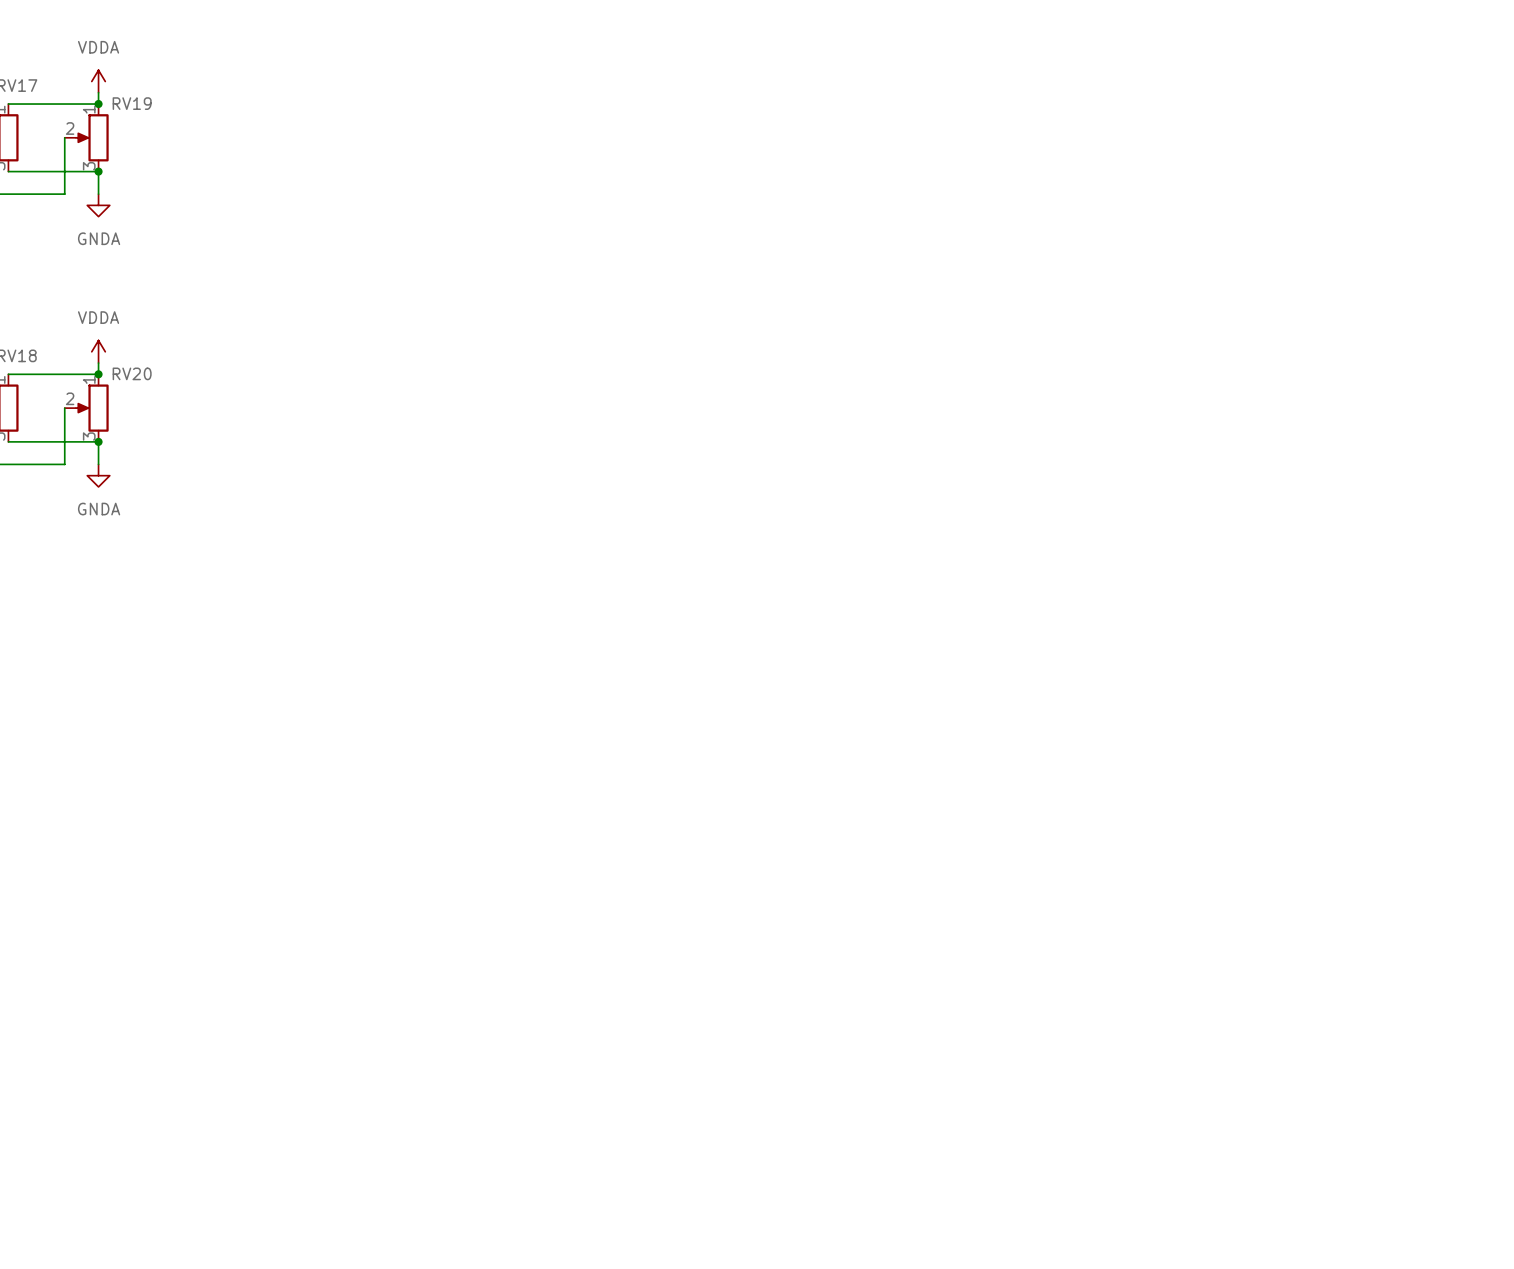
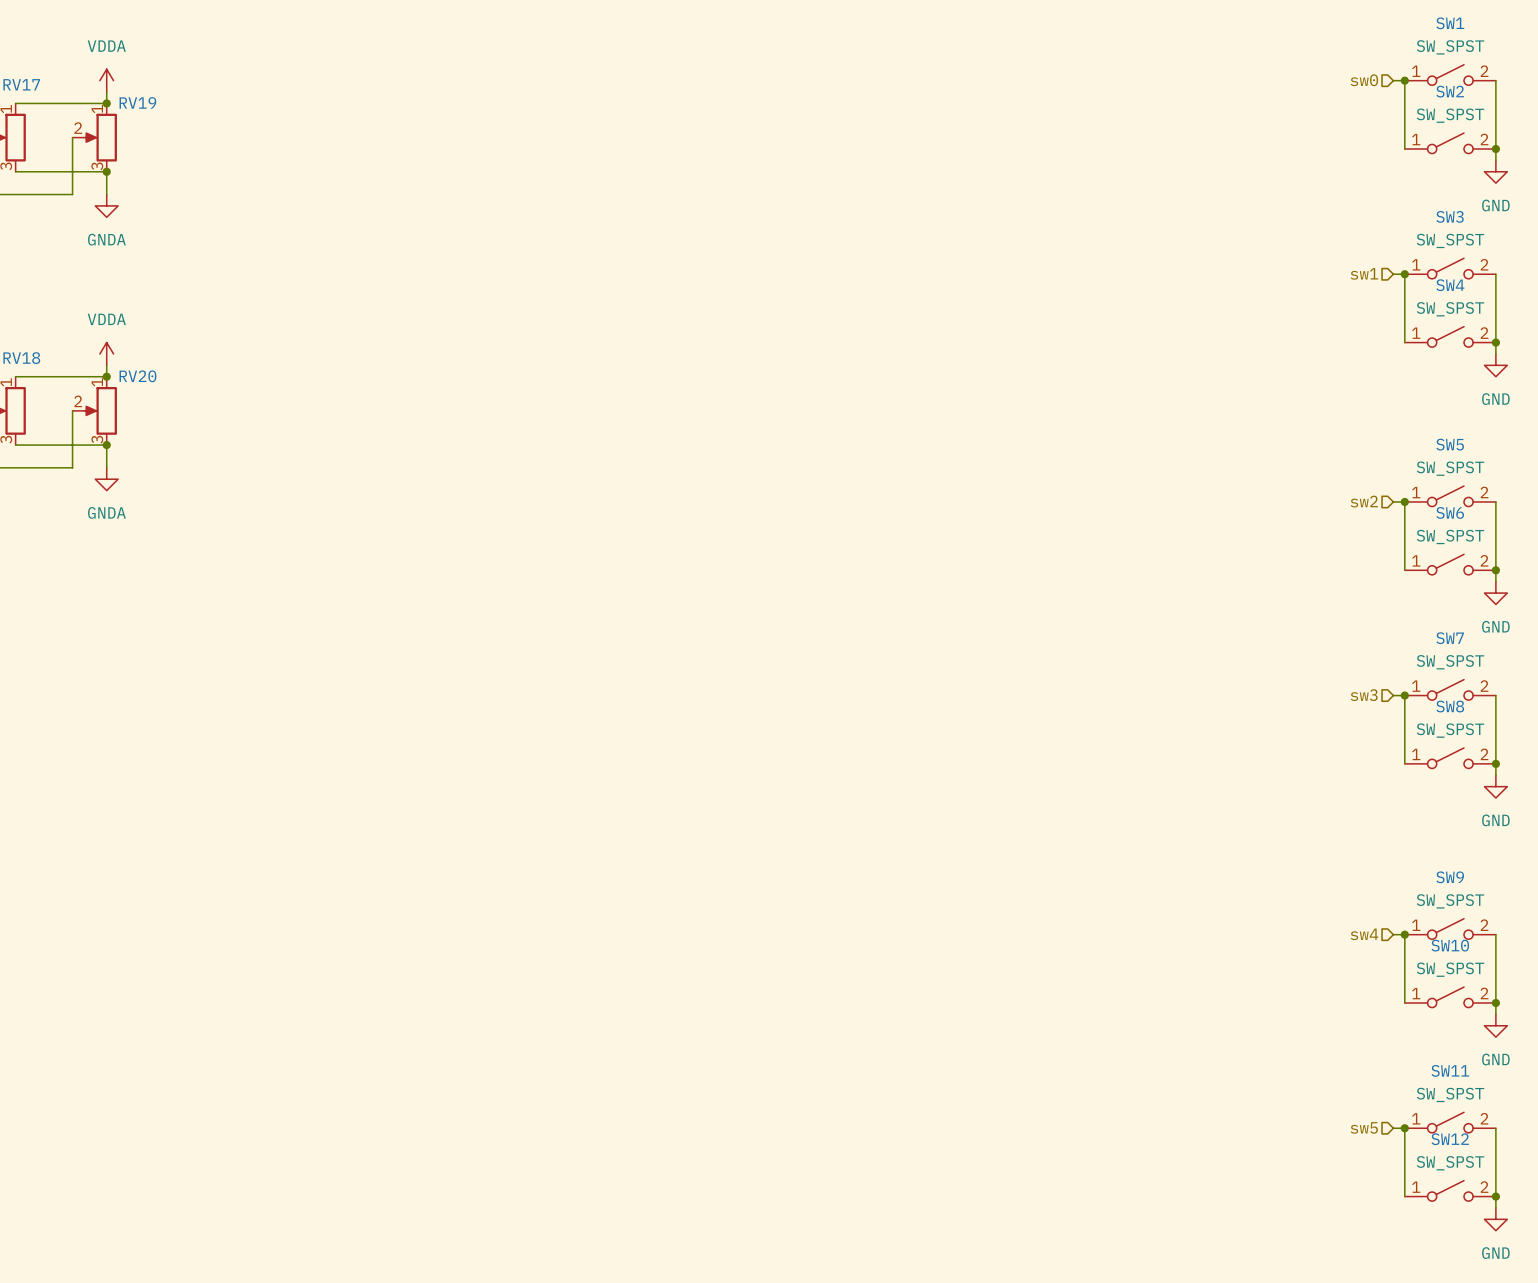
SW1: none -> SW_SPST (1450, 74)
hierarchical label: none -> sw0 (1364, 80)
wire: none -> (1393, 80) (1404, 80) (1404, 148)
junction: none -> (1404, 80)
wire: none -> (1495, 80) (1495, 160)
SW2: none -> SW_SPST (1450, 143)
junction: none -> (1495, 148)
power symbol: none -> GND (1495, 171)
SW3: none -> SW_SPST (1450, 268)
hierarchical label: none -> sw1 (1364, 273)
wire: none -> (1393, 274) (1404, 274) (1404, 342)
junction: none -> (1404, 274)
wire: none -> (1495, 274) (1495, 353)
SW4: none -> SW_SPST (1450, 336)
junction: none -> (1495, 342)
power symbol: none -> GND (1495, 365)
SW5: none -> SW_SPST (1450, 496)
hierarchical label: none -> sw2 (1364, 501)
wire: none -> (1393, 501) (1404, 501) (1404, 570)
junction: none -> (1404, 501)
wire: none -> (1495, 501) (1495, 581)
SW6: none -> SW_SPST (1450, 564)
junction: none -> (1495, 570)
power symbol: none -> GND (1495, 593)
SW7: none -> SW_SPST (1450, 689)
hierarchical label: none -> sw3 (1364, 695)
wire: none -> (1393, 695) (1404, 695) (1404, 763)
junction: none -> (1404, 695)
wire: none -> (1495, 695) (1495, 775)
SW8: none -> SW_SPST (1450, 758)
junction: none -> (1495, 763)
power symbol: none -> GND (1495, 786)
SW9: none -> SW_SPST (1450, 928)
hierarchical label: none -> sw4 (1364, 934)
wire: none -> (1393, 934) (1404, 934) (1404, 1002)
junction: none -> (1404, 934)
wire: none -> (1495, 934) (1495, 1014)
SW10: none -> SW_SPST (1450, 997)
junction: none -> (1495, 1002)
power symbol: none -> GND (1495, 1025)
SW11: none -> SW_SPST (1450, 1122)
hierarchical label: none -> sw5 (1364, 1127)
wire: none -> (1393, 1128) (1404, 1128) (1404, 1196)
junction: none -> (1404, 1128)
wire: none -> (1495, 1128) (1495, 1207)
SW12: none -> SW_SPST (1450, 1190)
junction: none -> (1495, 1196)
power symbol: none -> GND (1495, 1219)

